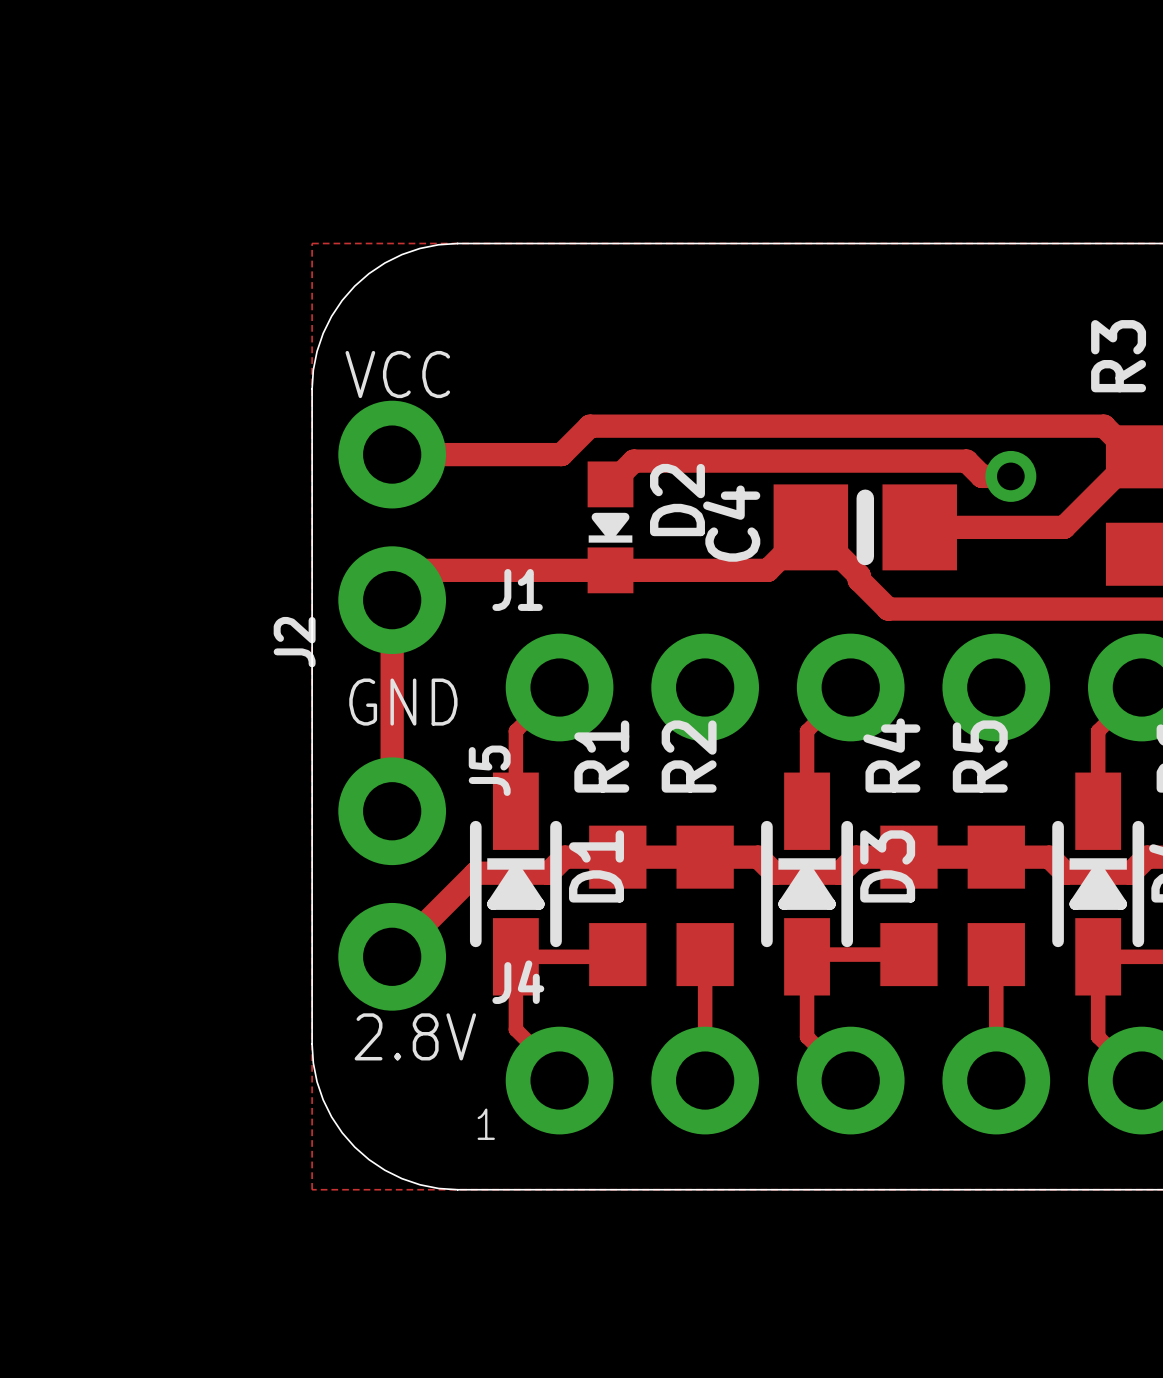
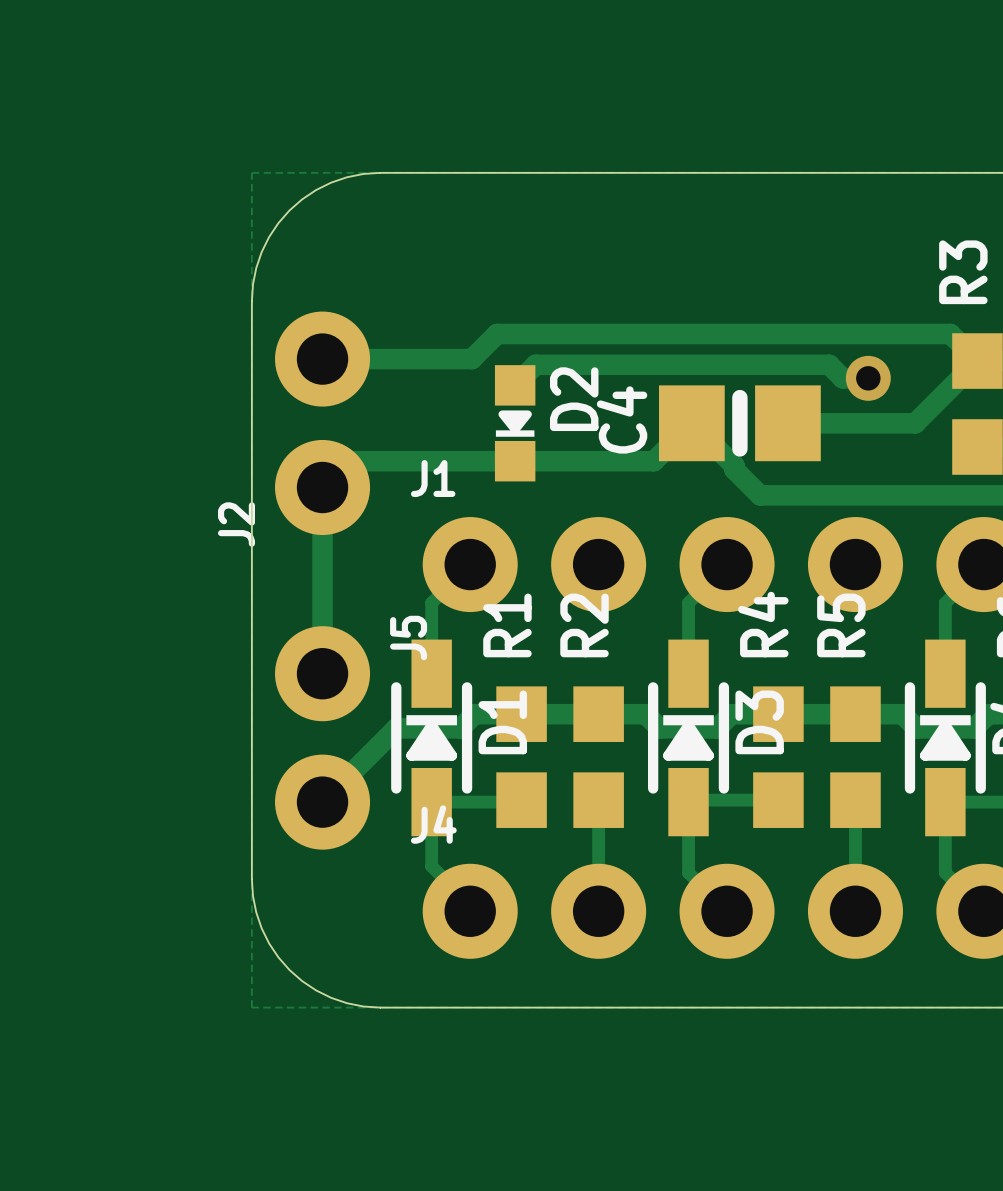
text: VCC (397, 374) -> none
text: GND (403, 702) -> none
text: 2.8V (415, 1036) -> none
text: 1 (486, 1124) -> none

